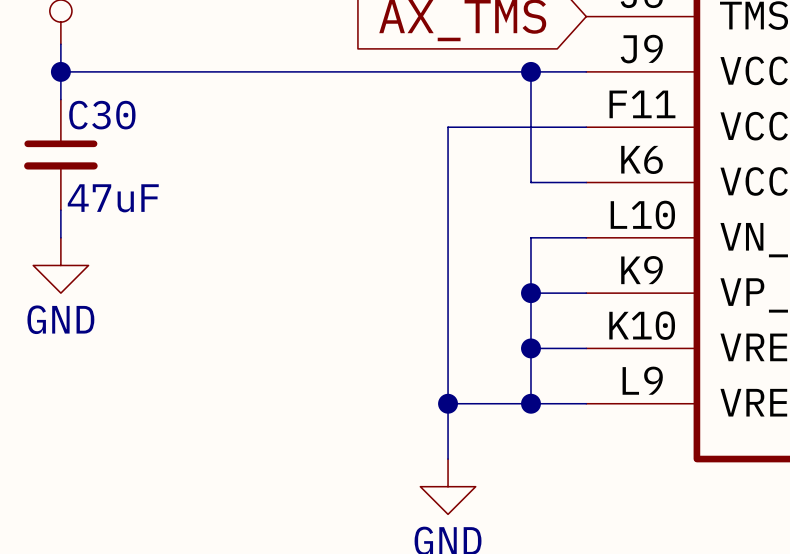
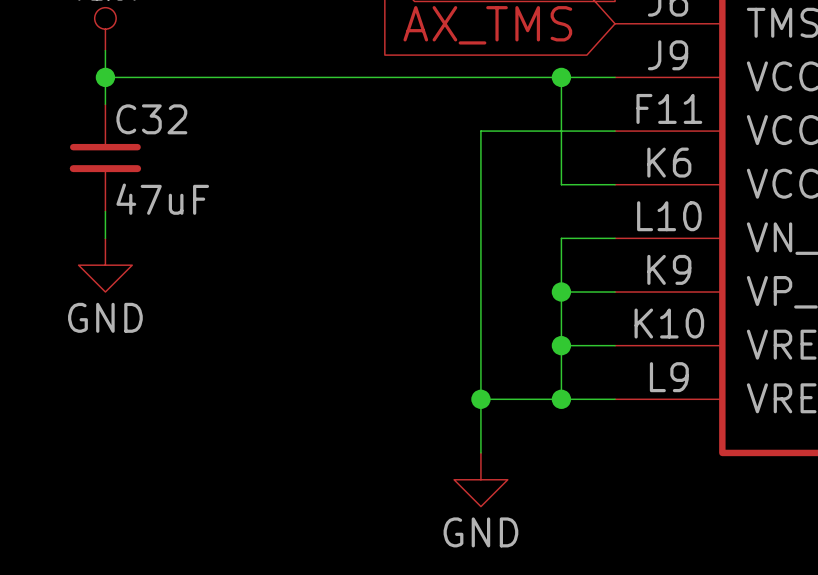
C30 name: C30 (102, 115) -> C32 (151, 119)

